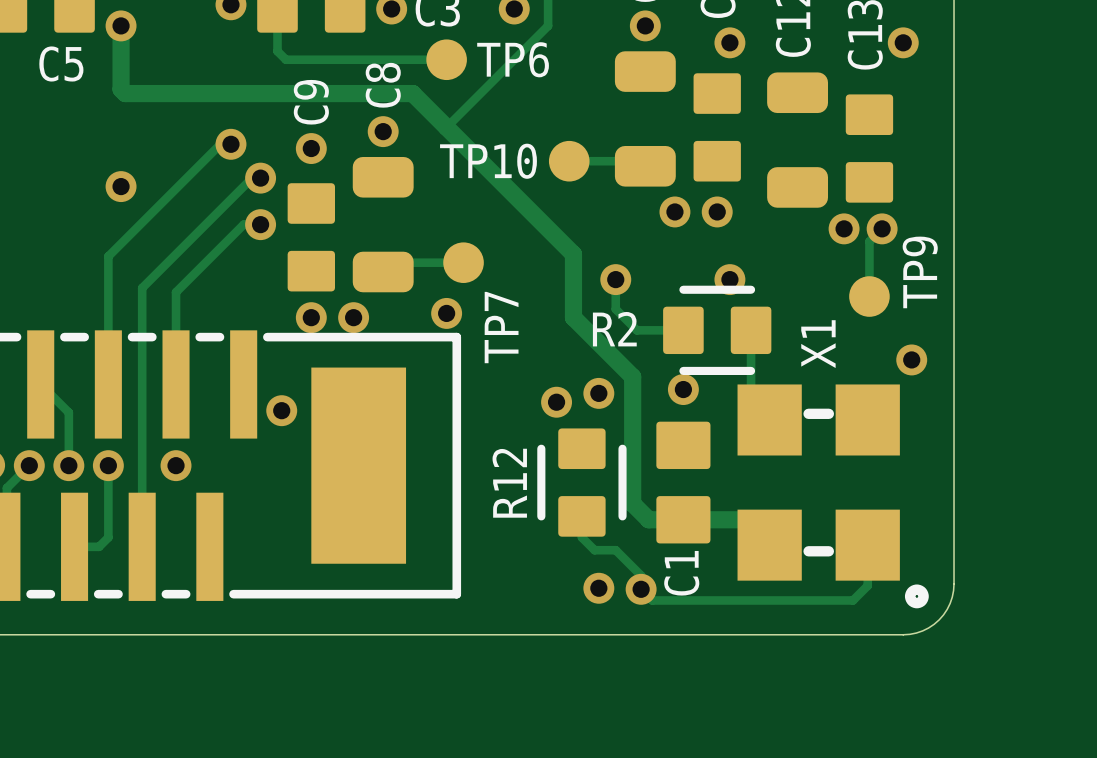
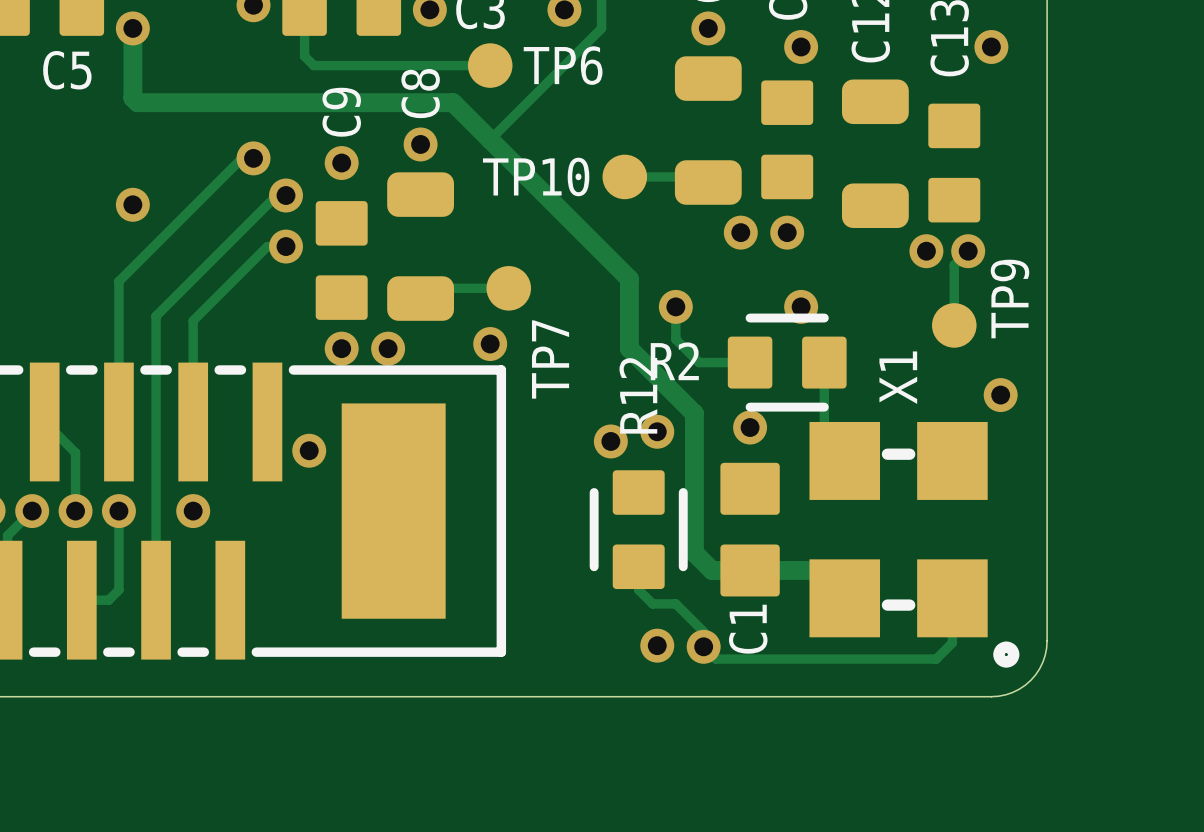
R12 name position: R12 (509, 483) -> R12 (638, 395)

